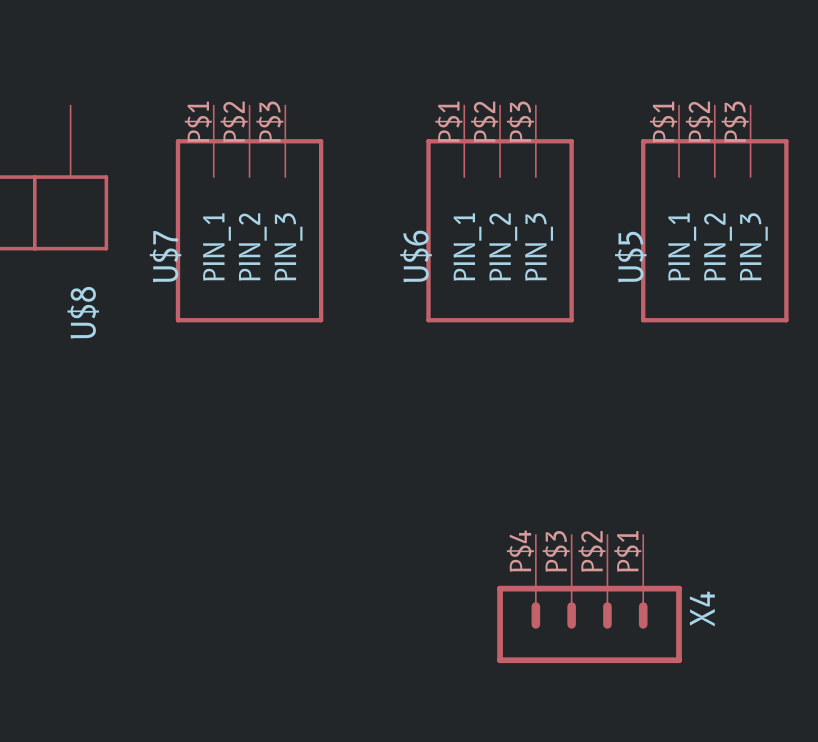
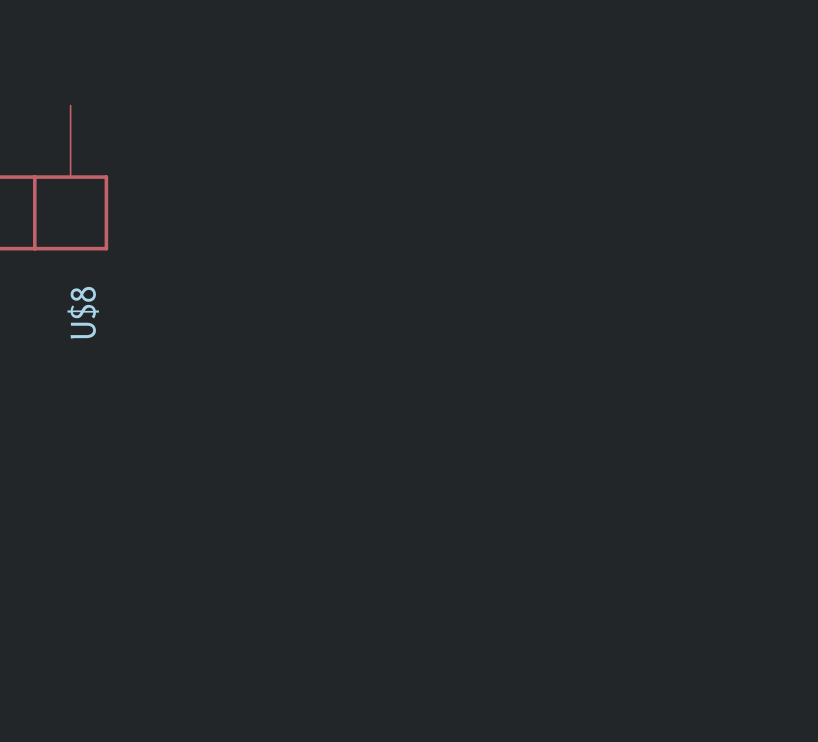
U$7: (249, 213) -> none
U$6: (500, 213) -> none
U$5: (714, 213) -> none
X4: (589, 599) -> none

